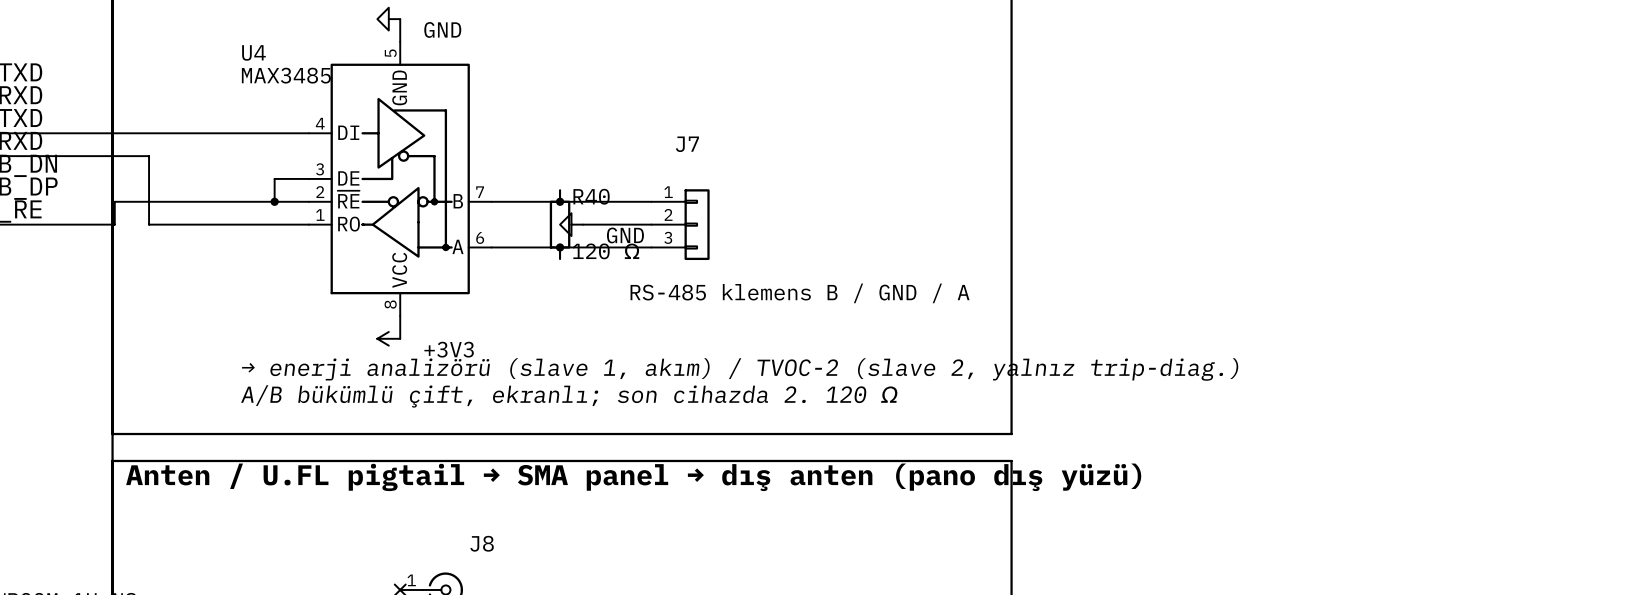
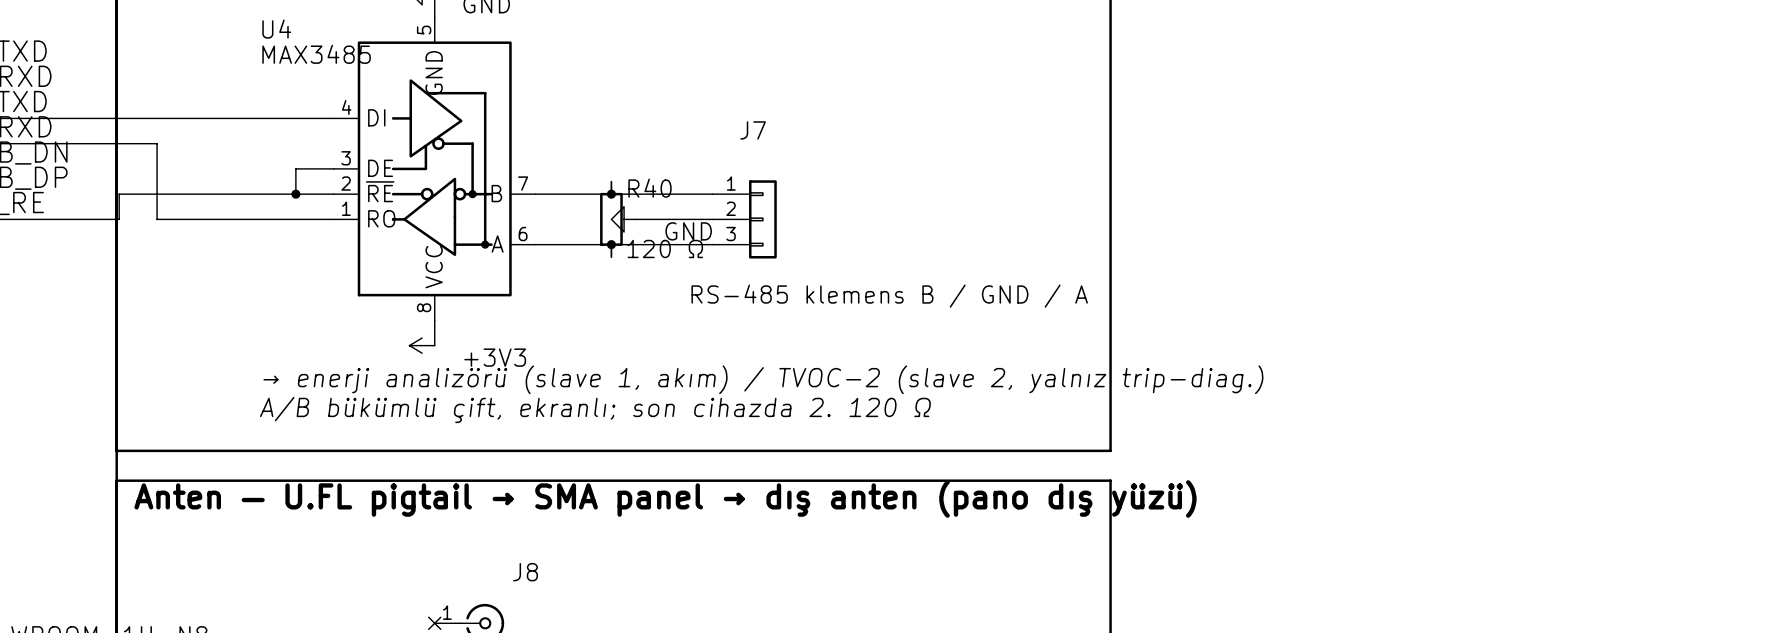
text: Anten / U.FL pigtail → SMA panel → dış anten (pano dış yüzü) (633, 477) -> Anten — U.FL pigtail → SMA panel → dış anten (pano dış yüzü) (665, 499)

